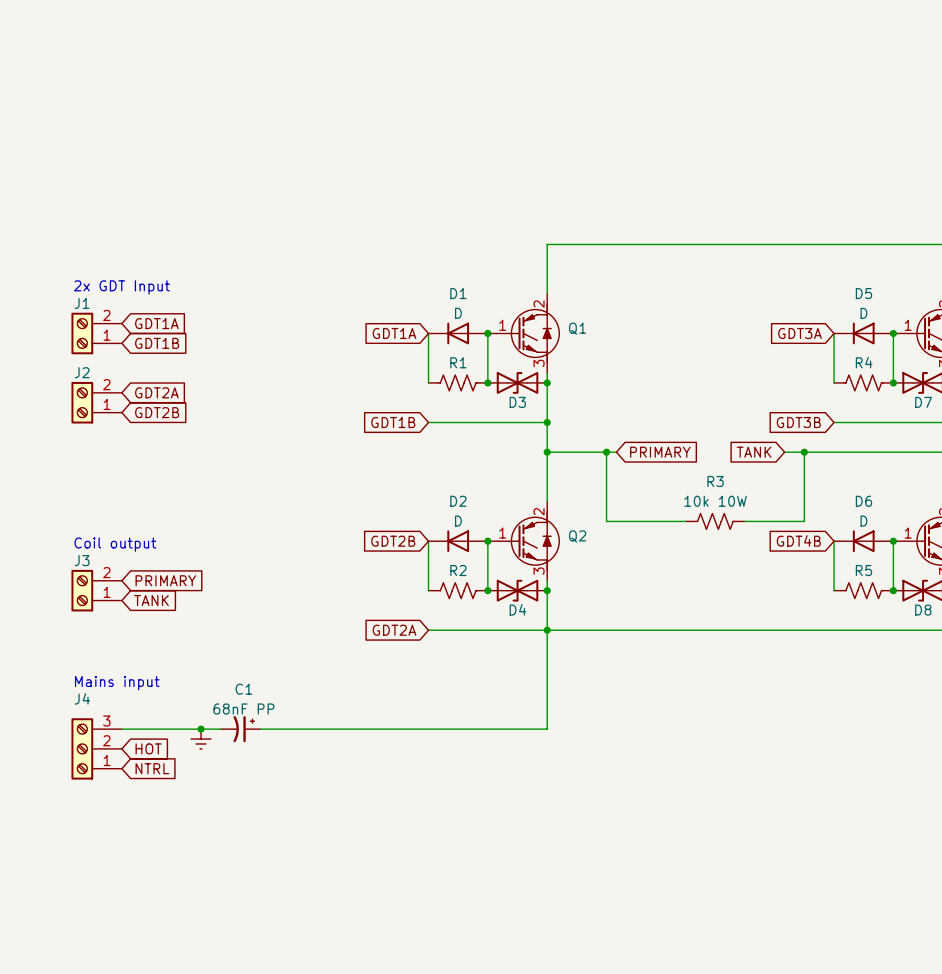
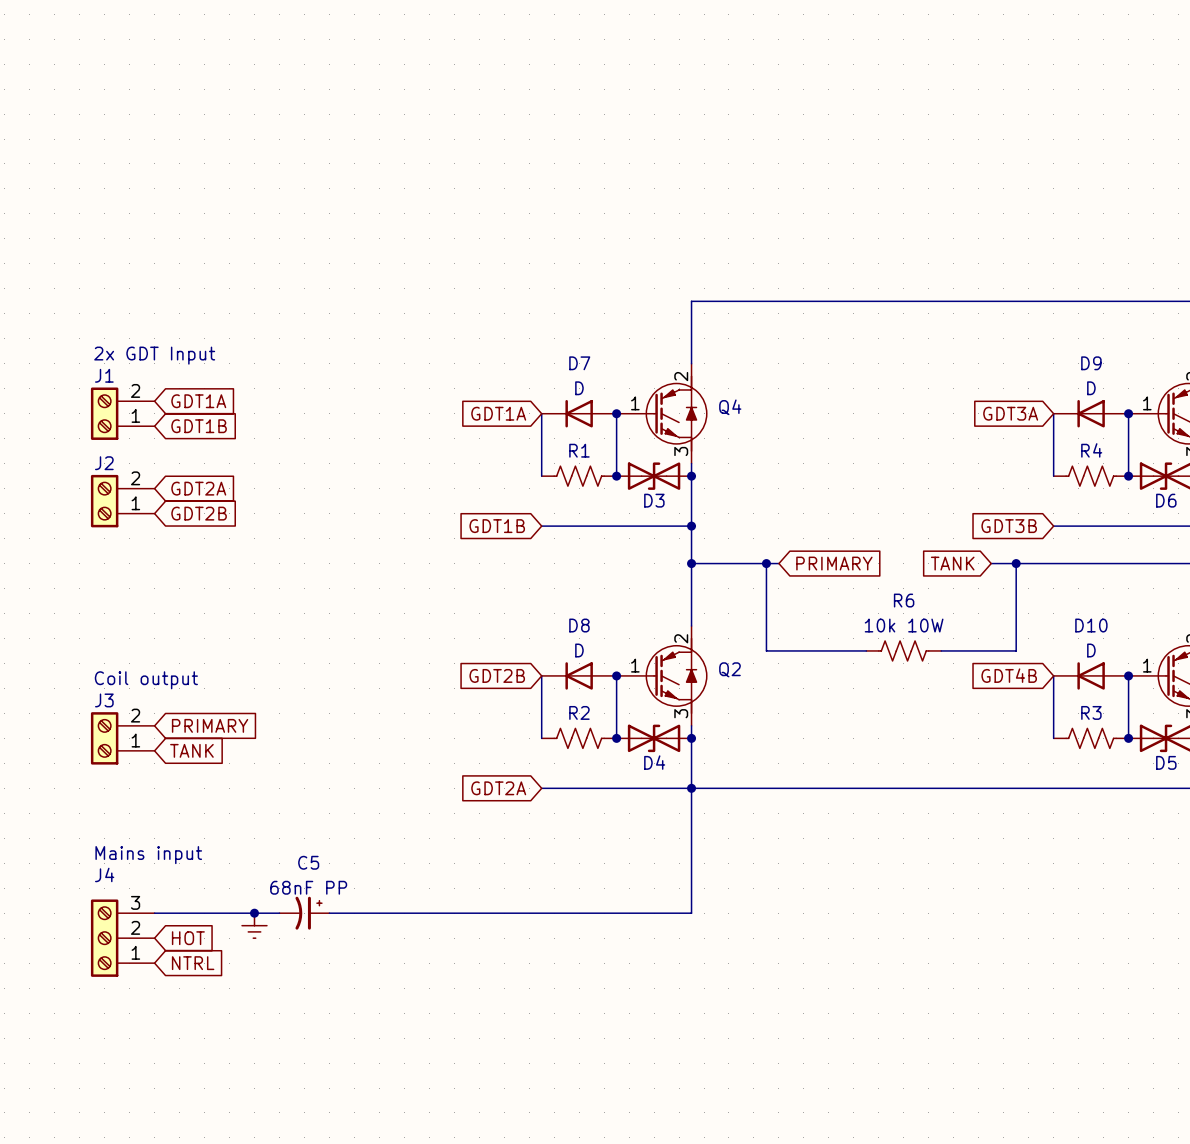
D1 name: D1 (458, 293) -> D7 (579, 363)
D5 name: D5 (863, 293) -> D9 (1091, 363)
Q1 name: Q1 (577, 328) -> Q4 (730, 407)
D7 name: D7 (923, 402) -> D6 (1166, 500)
R3 name: R3 (715, 481) -> R6 (904, 600)
D2 name: D2 (458, 501) -> D8 (579, 625)
D6 name: D6 (863, 501) -> D10 (1091, 625)
R5 name: R5 (863, 570) -> R3 (1091, 712)
D8 name: D8 (923, 610) -> D5 (1166, 762)
C1 name: C1 (243, 689) -> C5 (308, 862)

